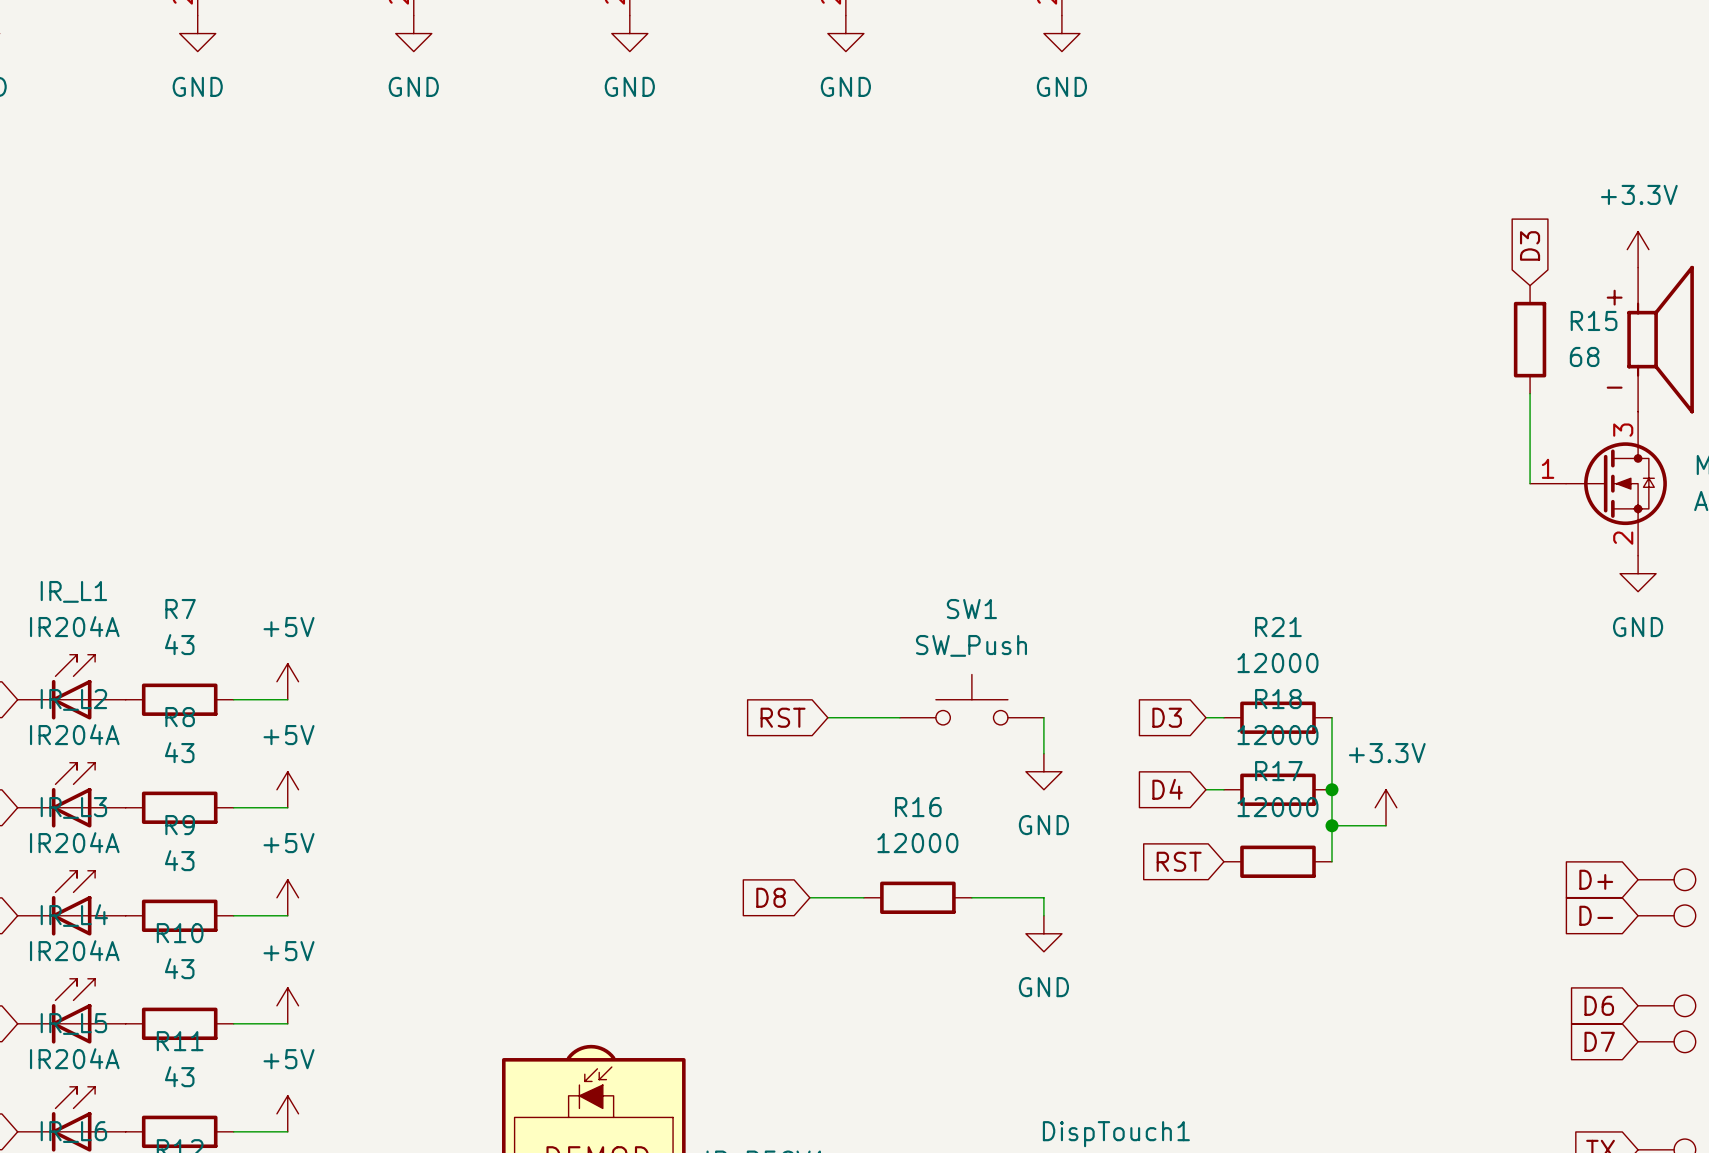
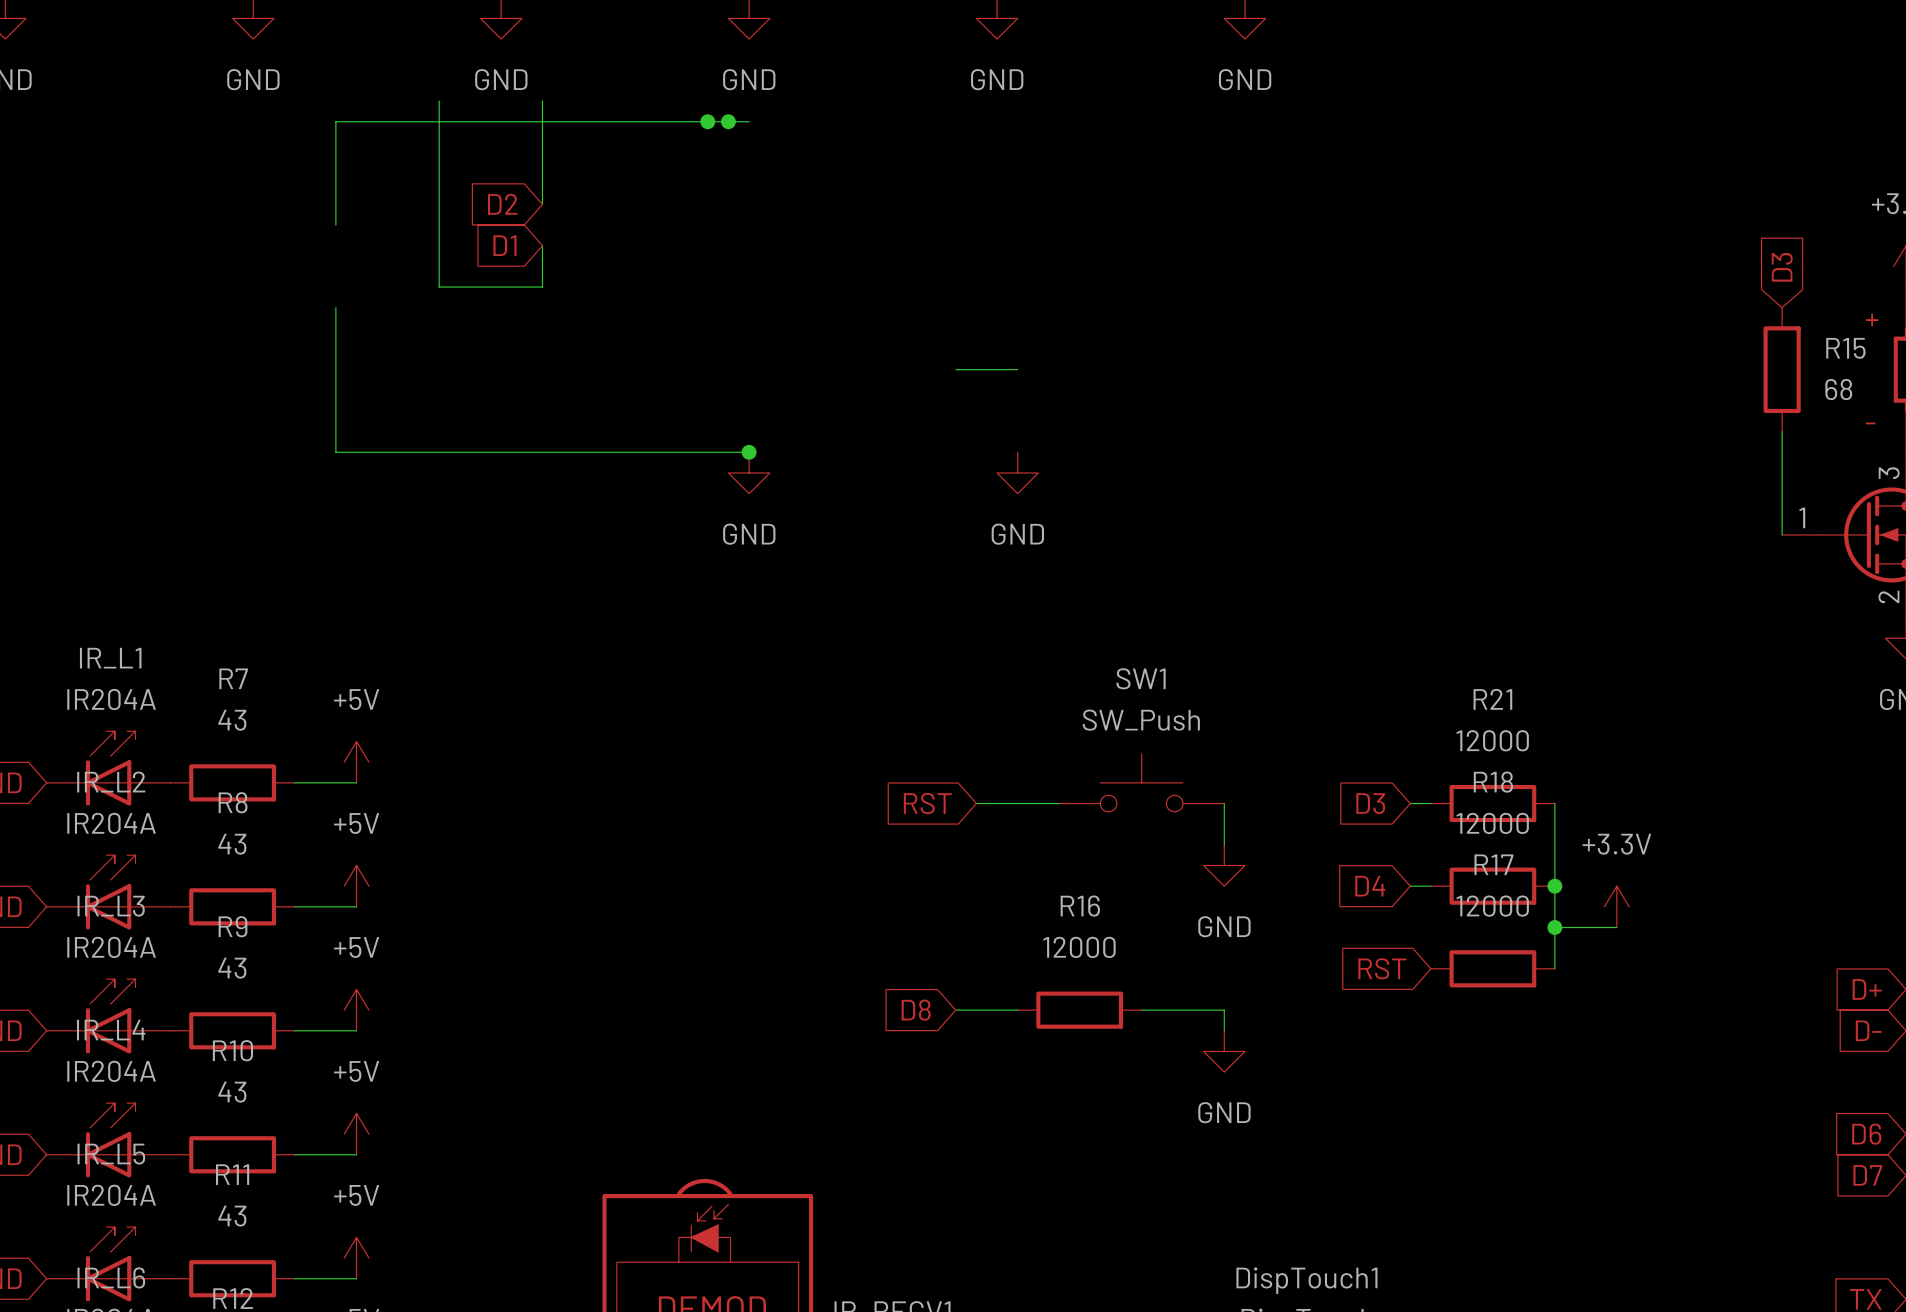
wire: none -> (439, 101) (439, 287) (542, 287) (542, 245)
wire: none -> (542, 101) (542, 204)
junction: none -> (707, 121)
junction: none -> (728, 121)
wire: none -> (749, 121) (335, 121) (335, 225)
global label: none -> D2 (502, 204)
global label: none -> D1 (504, 245)
wire: none -> (335, 307) (335, 452) (749, 452)
wire: none -> (955, 369) (1017, 369)
junction: none -> (749, 452)
power symbol: none -> GND (749, 472)
power symbol: none -> GND (1017, 472)

